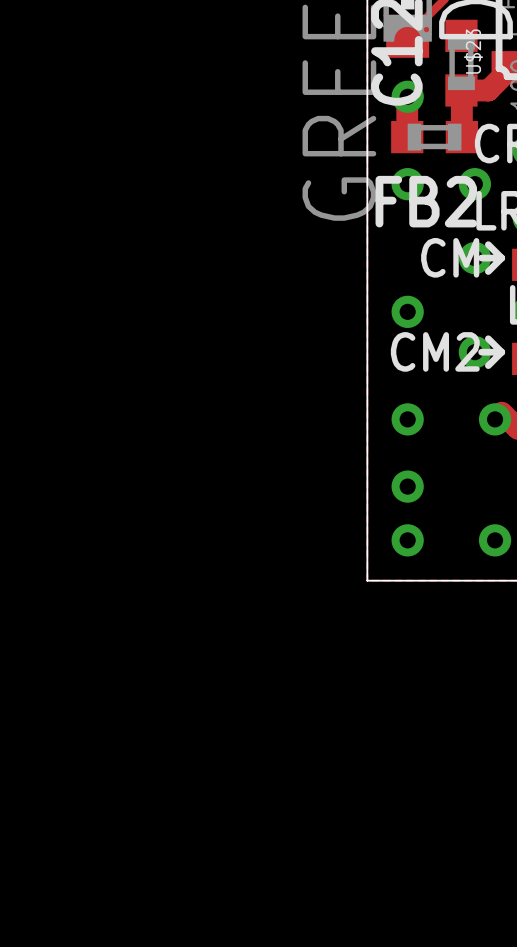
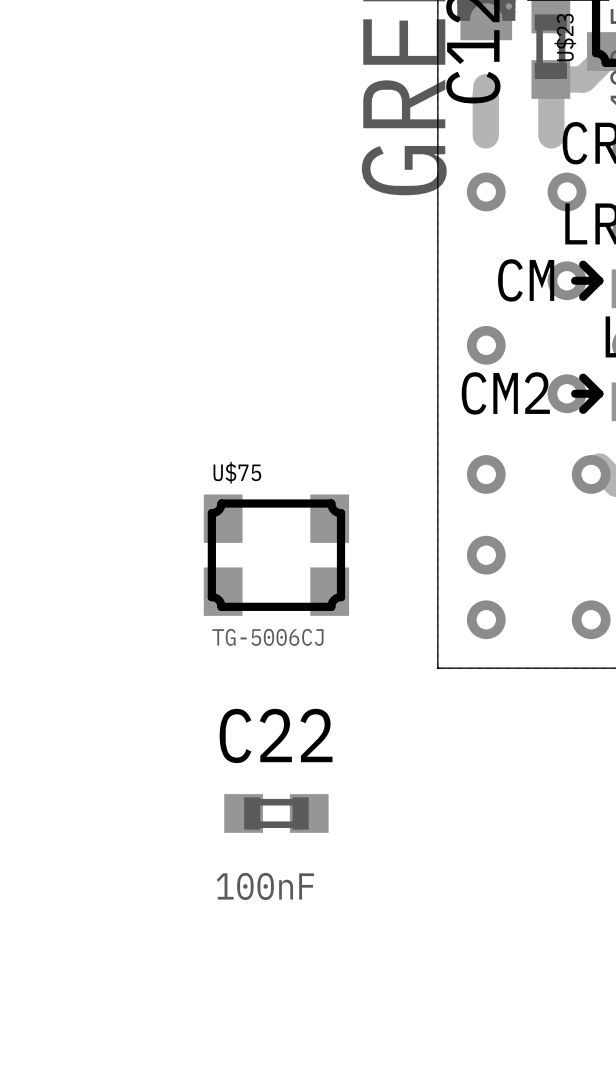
via: (407, 96) -> none
FB2: (434, 137) -> none
U$75: none -> TG-5006CJ (276, 555)
C22: none -> 100nF (276, 813)

